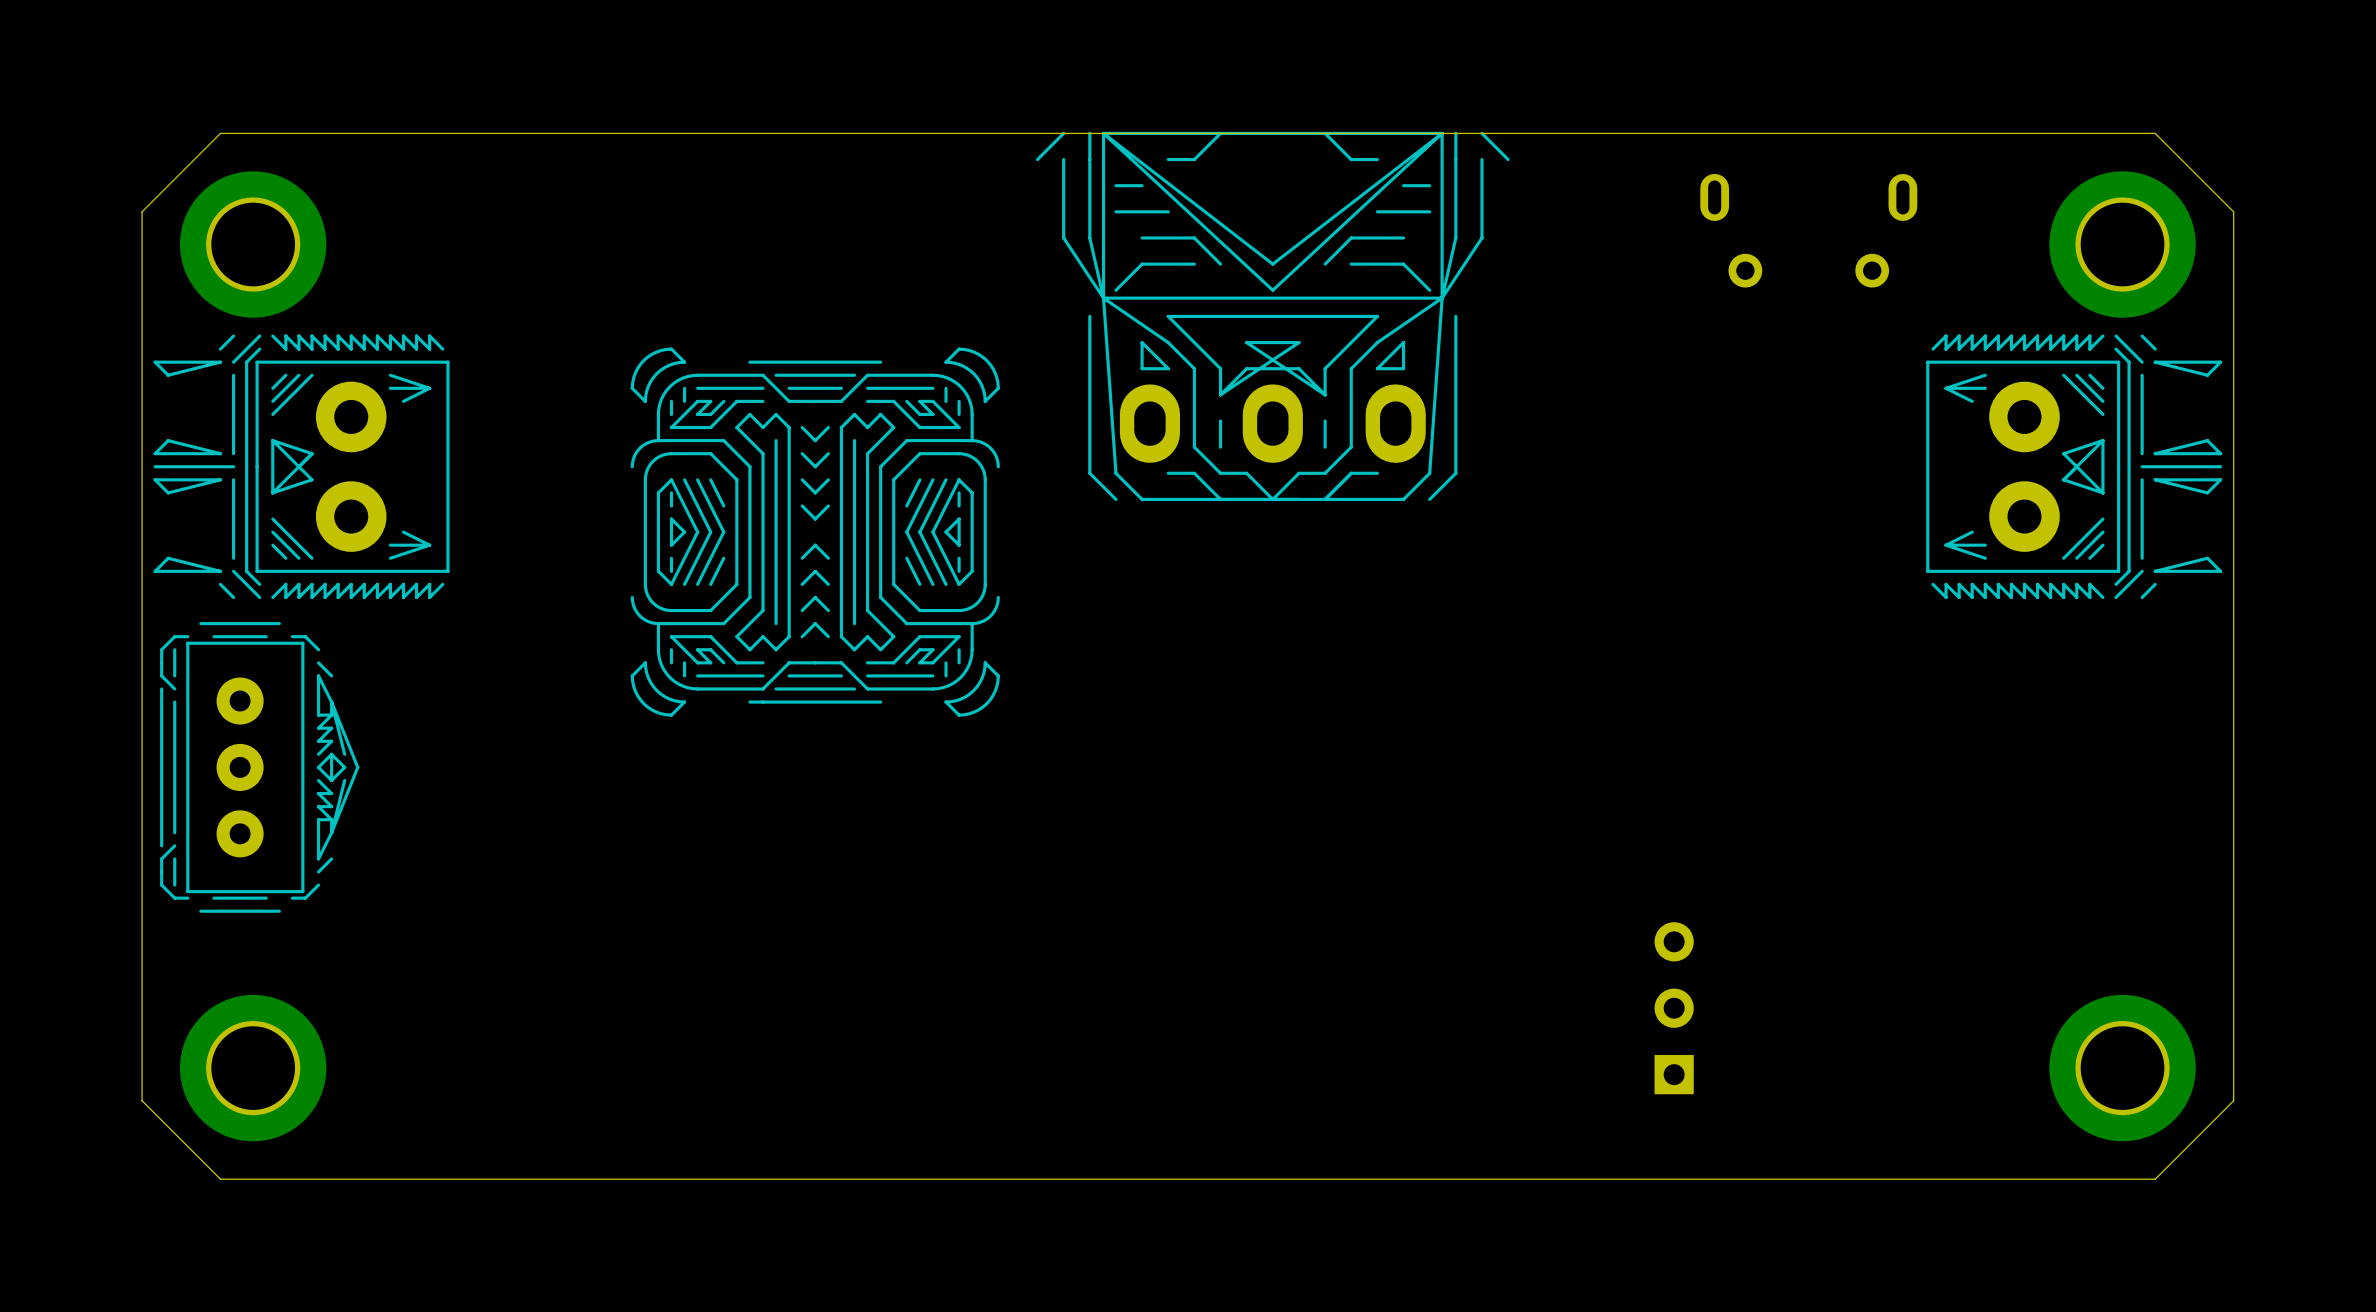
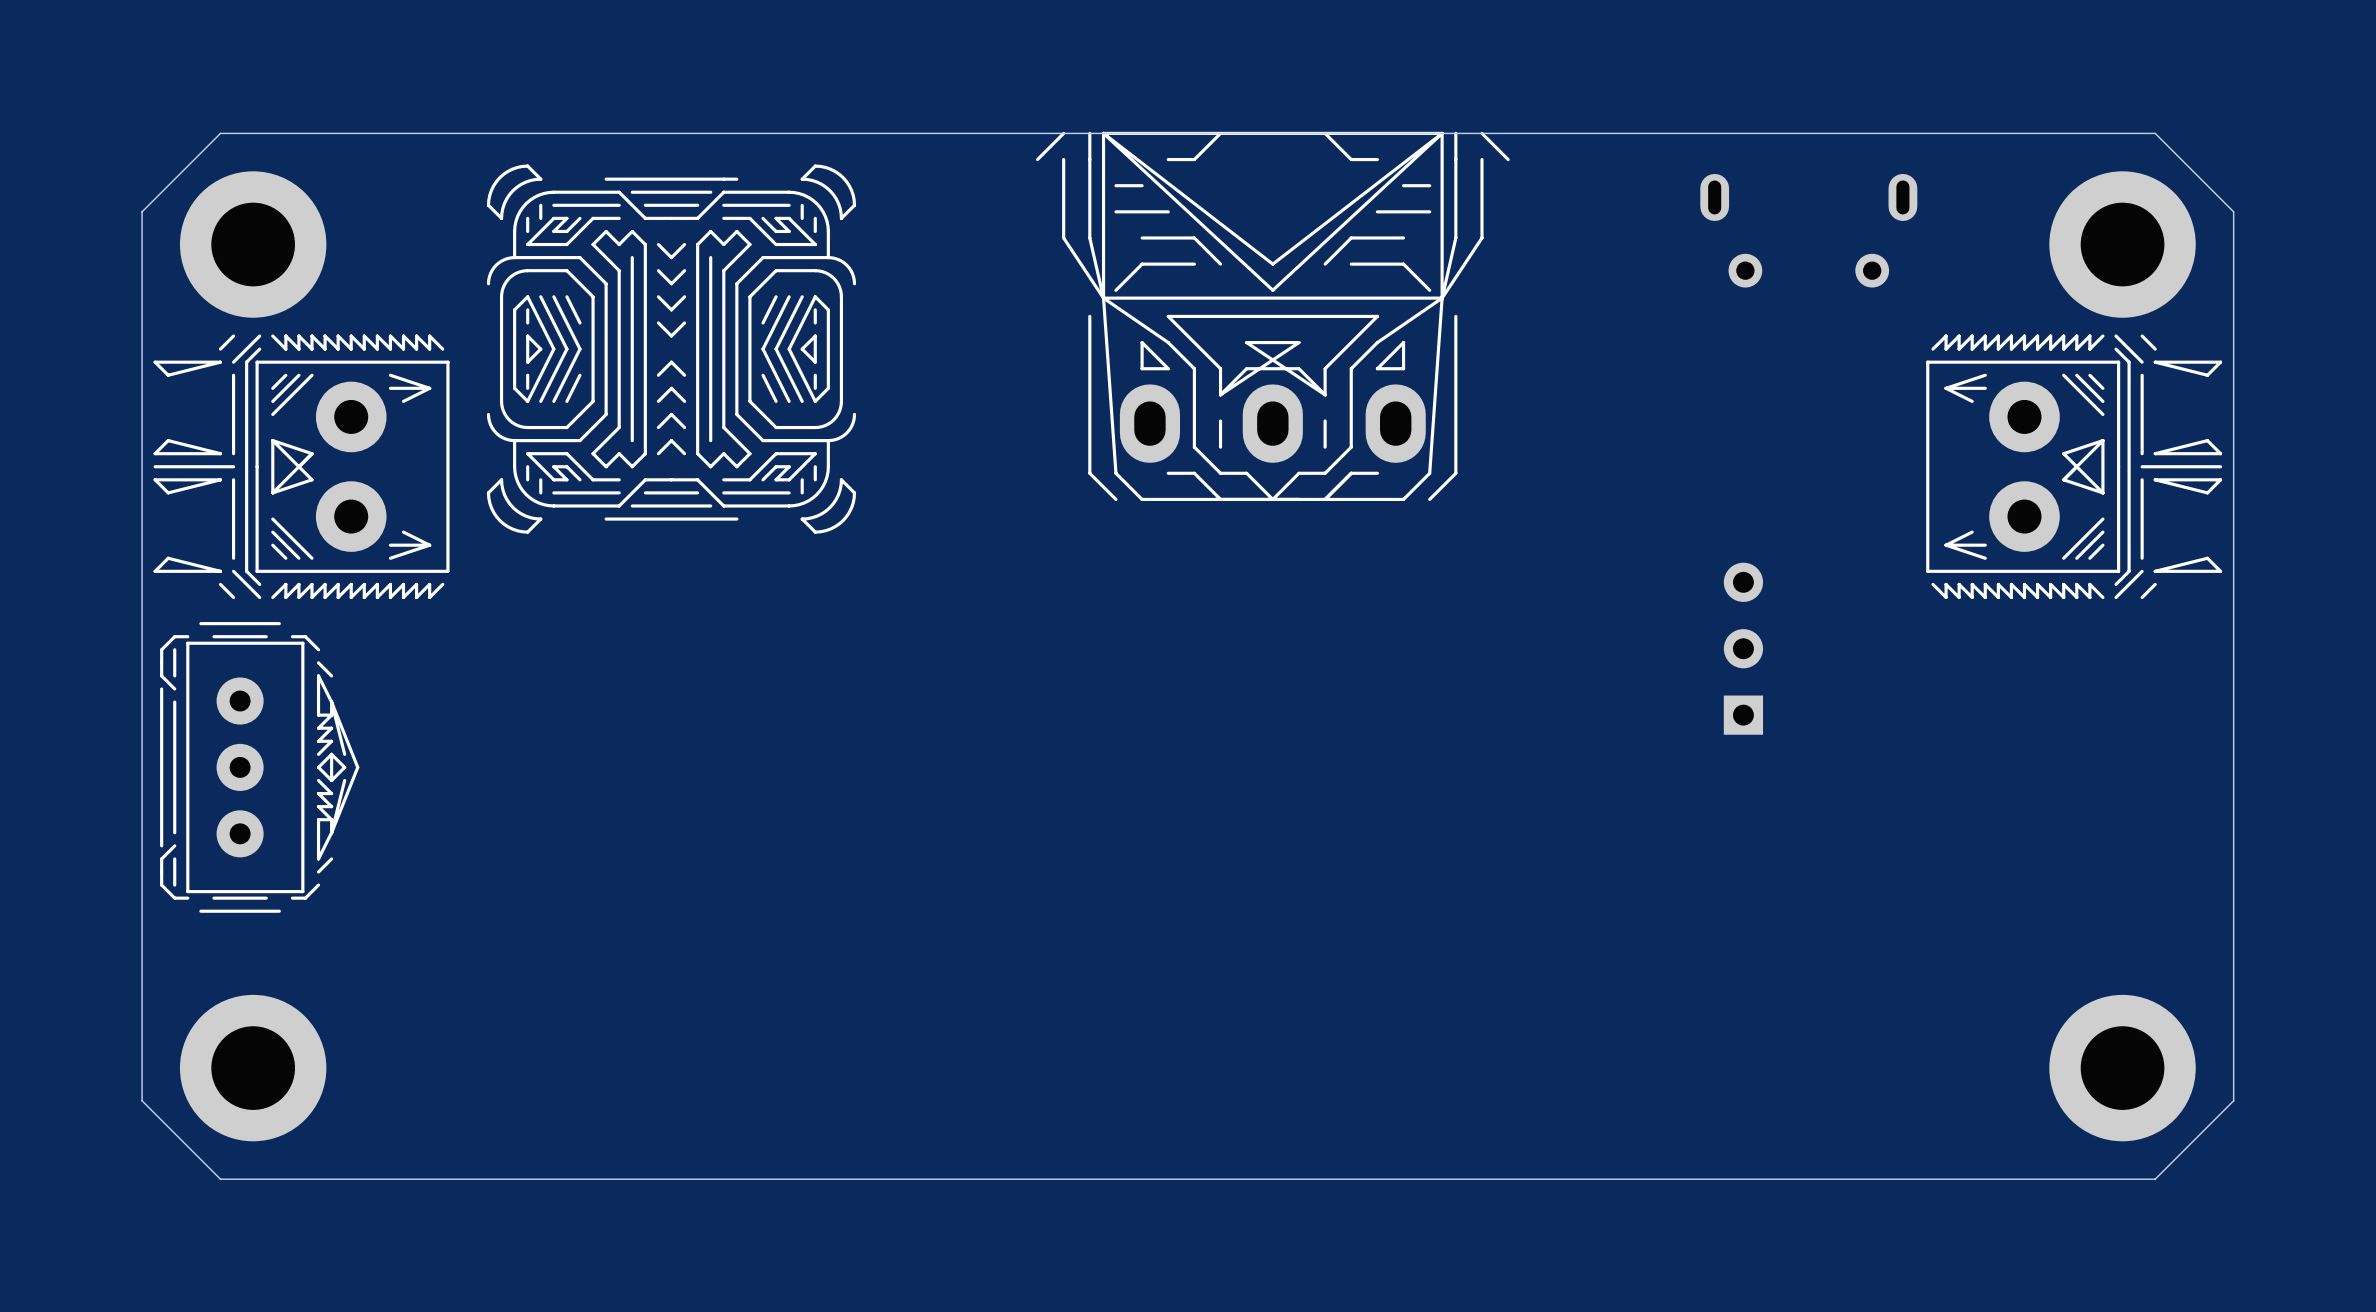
part rotation: 0° (815, 532) -> 180° (671, 349)
part position: (815, 532) -> (671, 349)
part position: (1674, 1008) -> (1743, 648)

